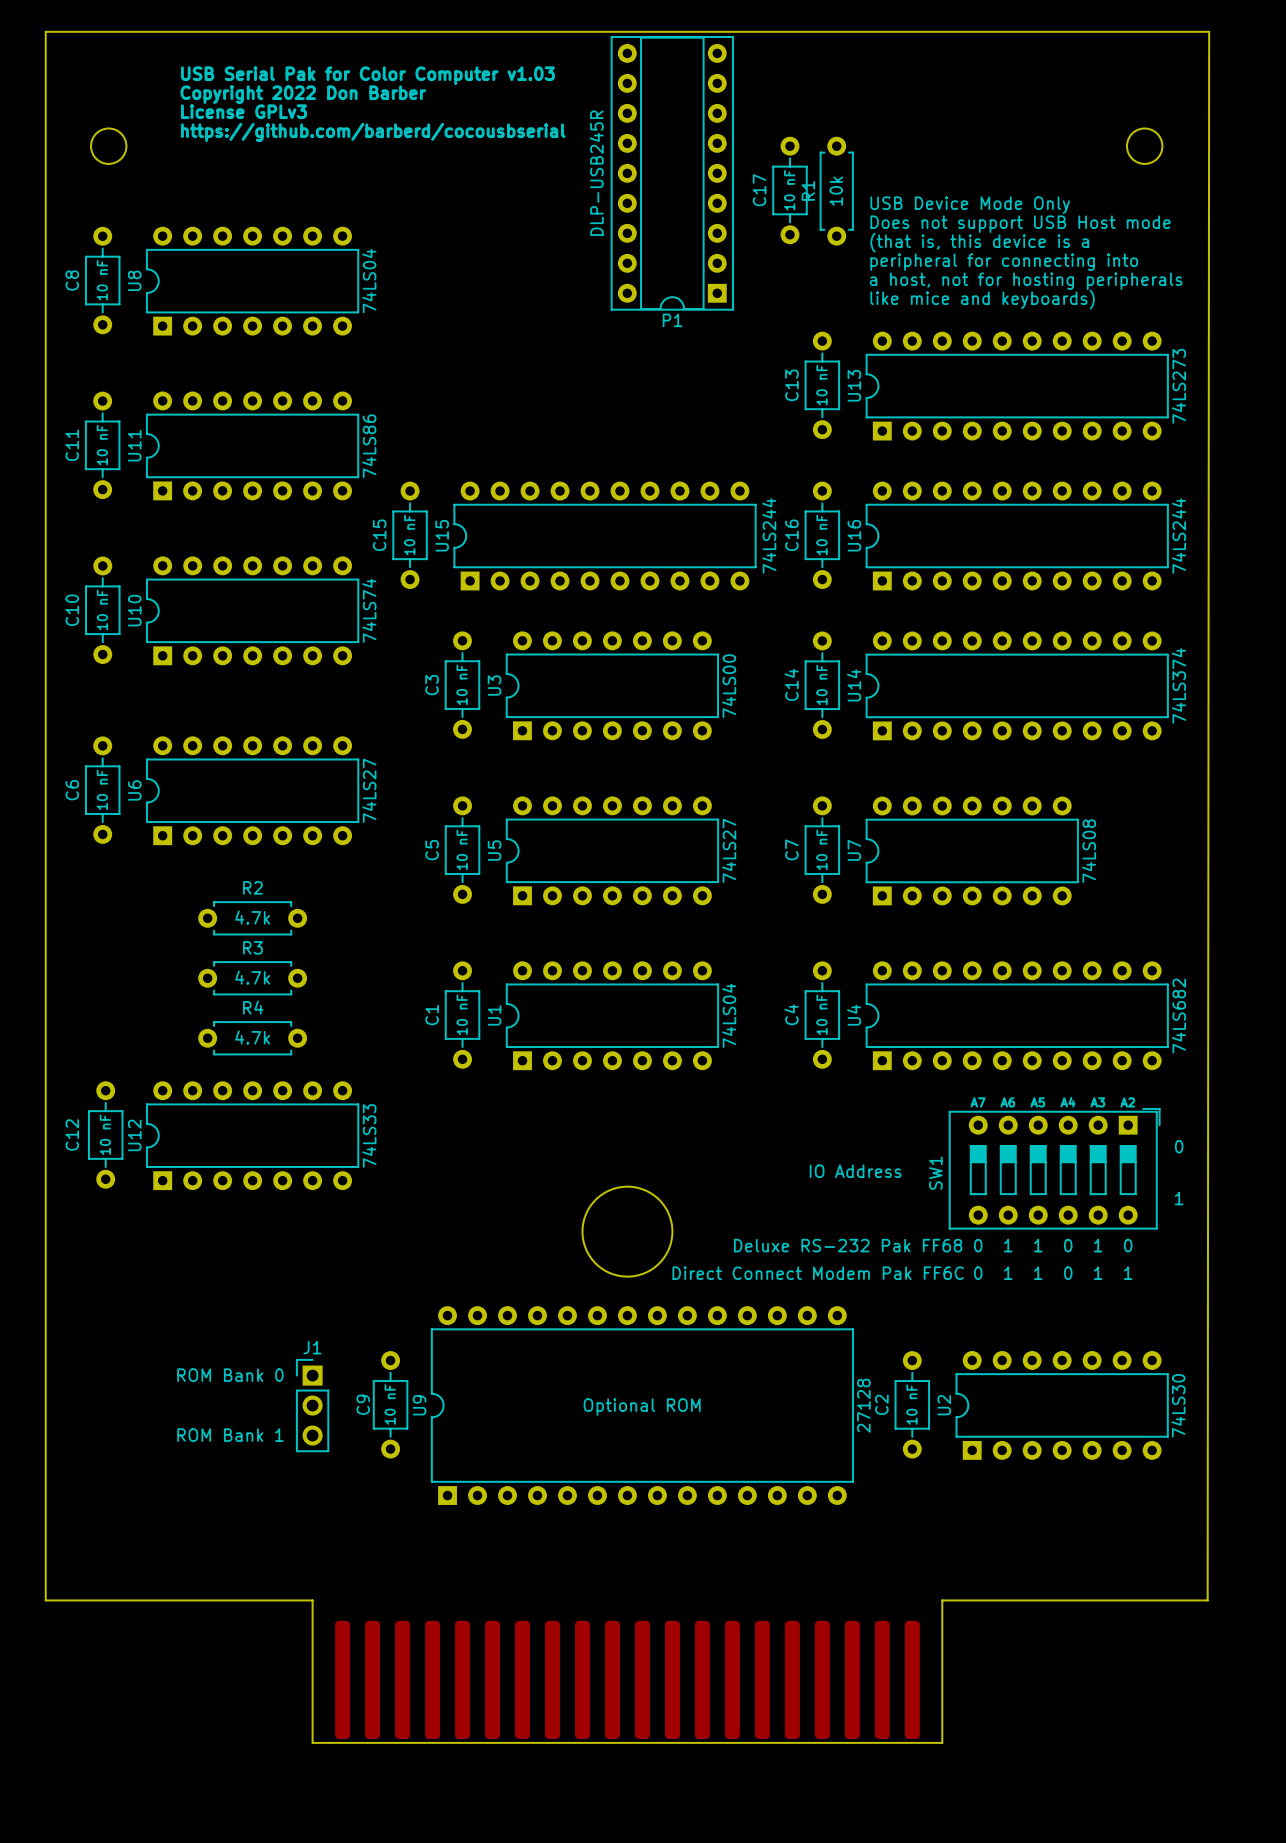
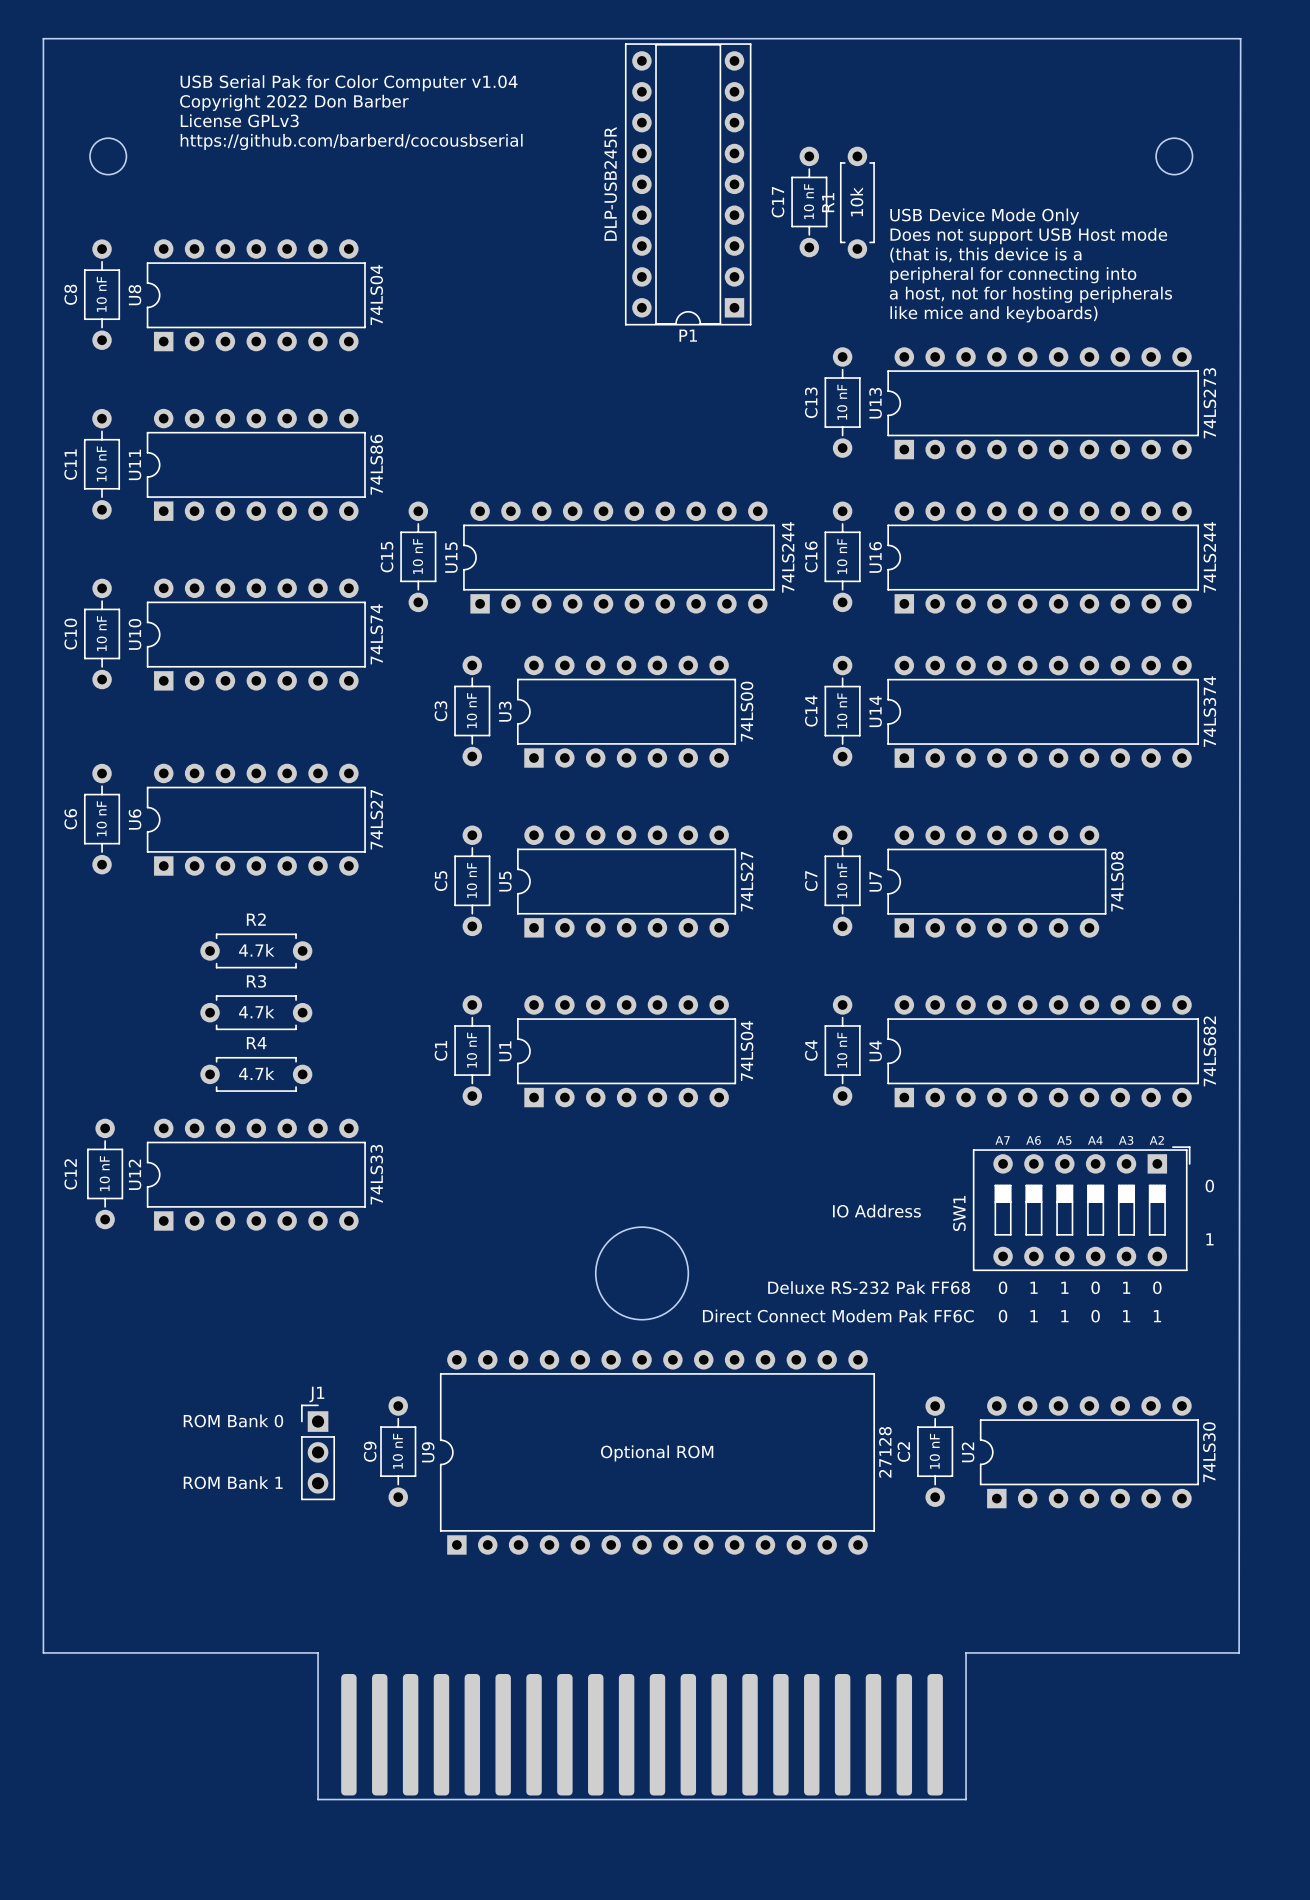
text: USB Serial Pak for Color Computer v1.03 (367, 75) -> USB Serial Pak for Color Computer v1.04 (349, 83)

